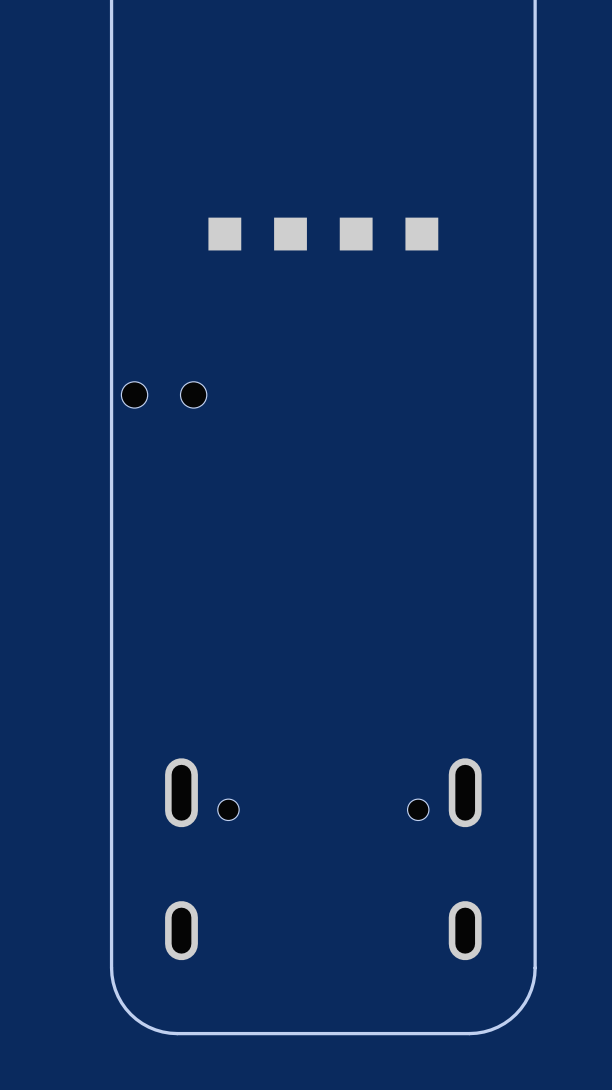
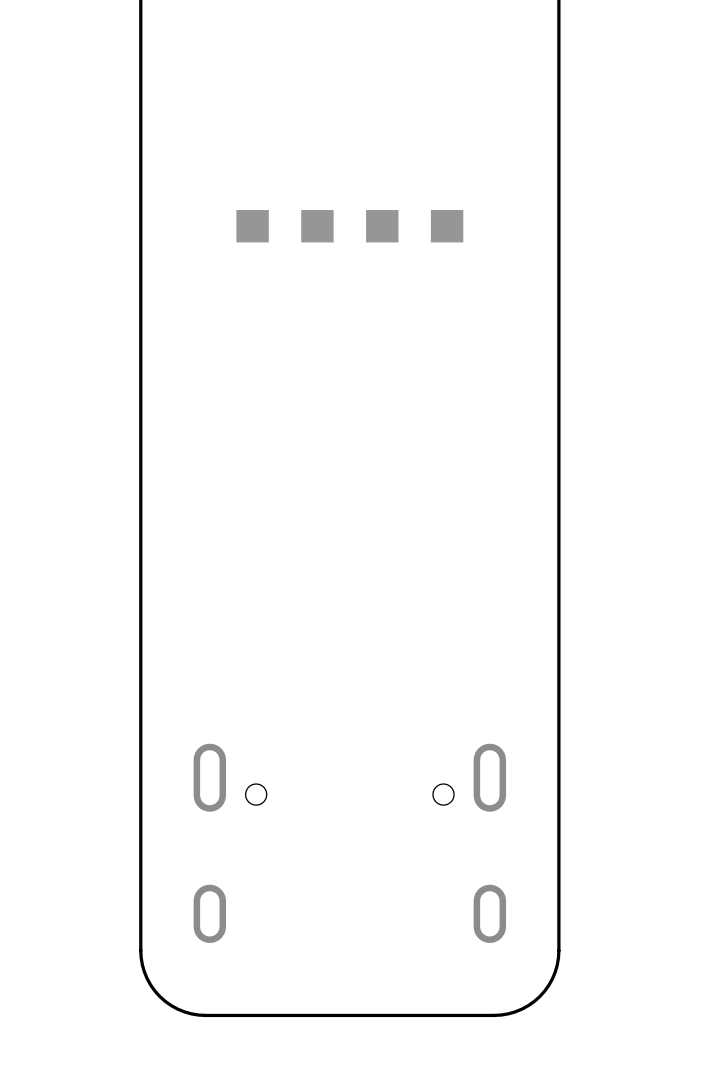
part: (164, 394) -> none

